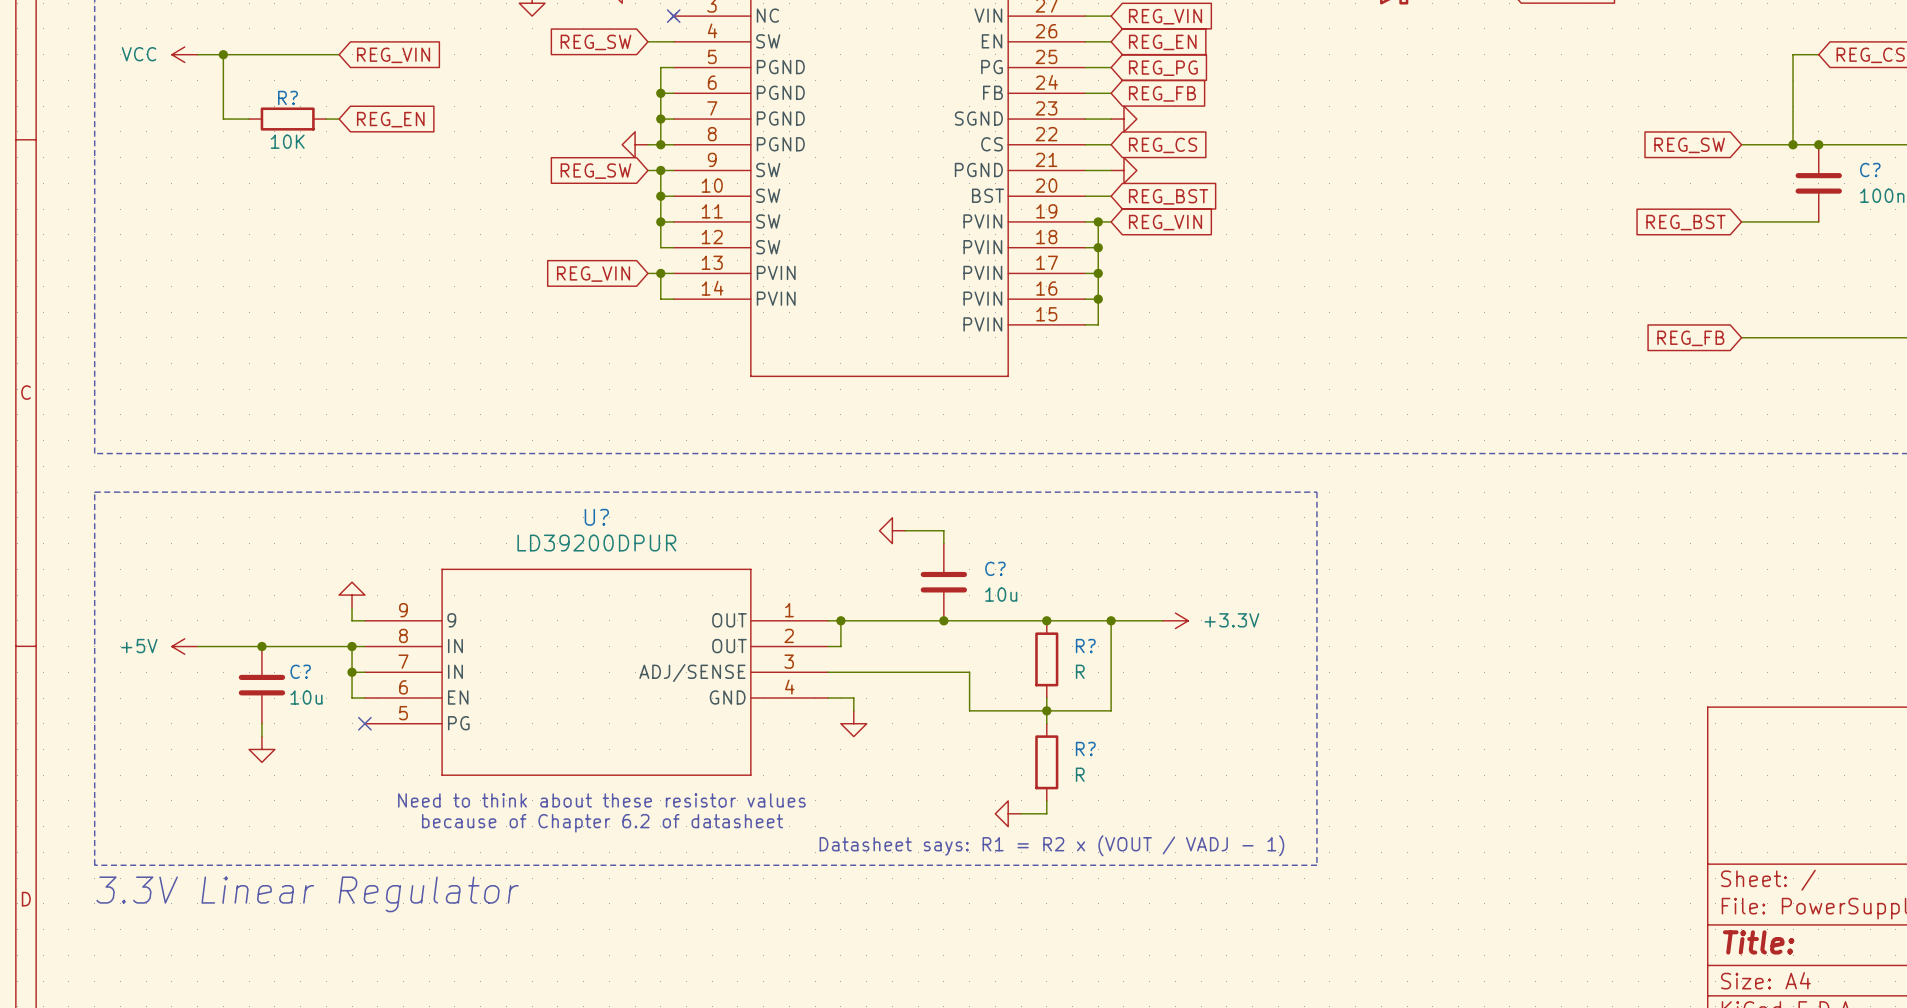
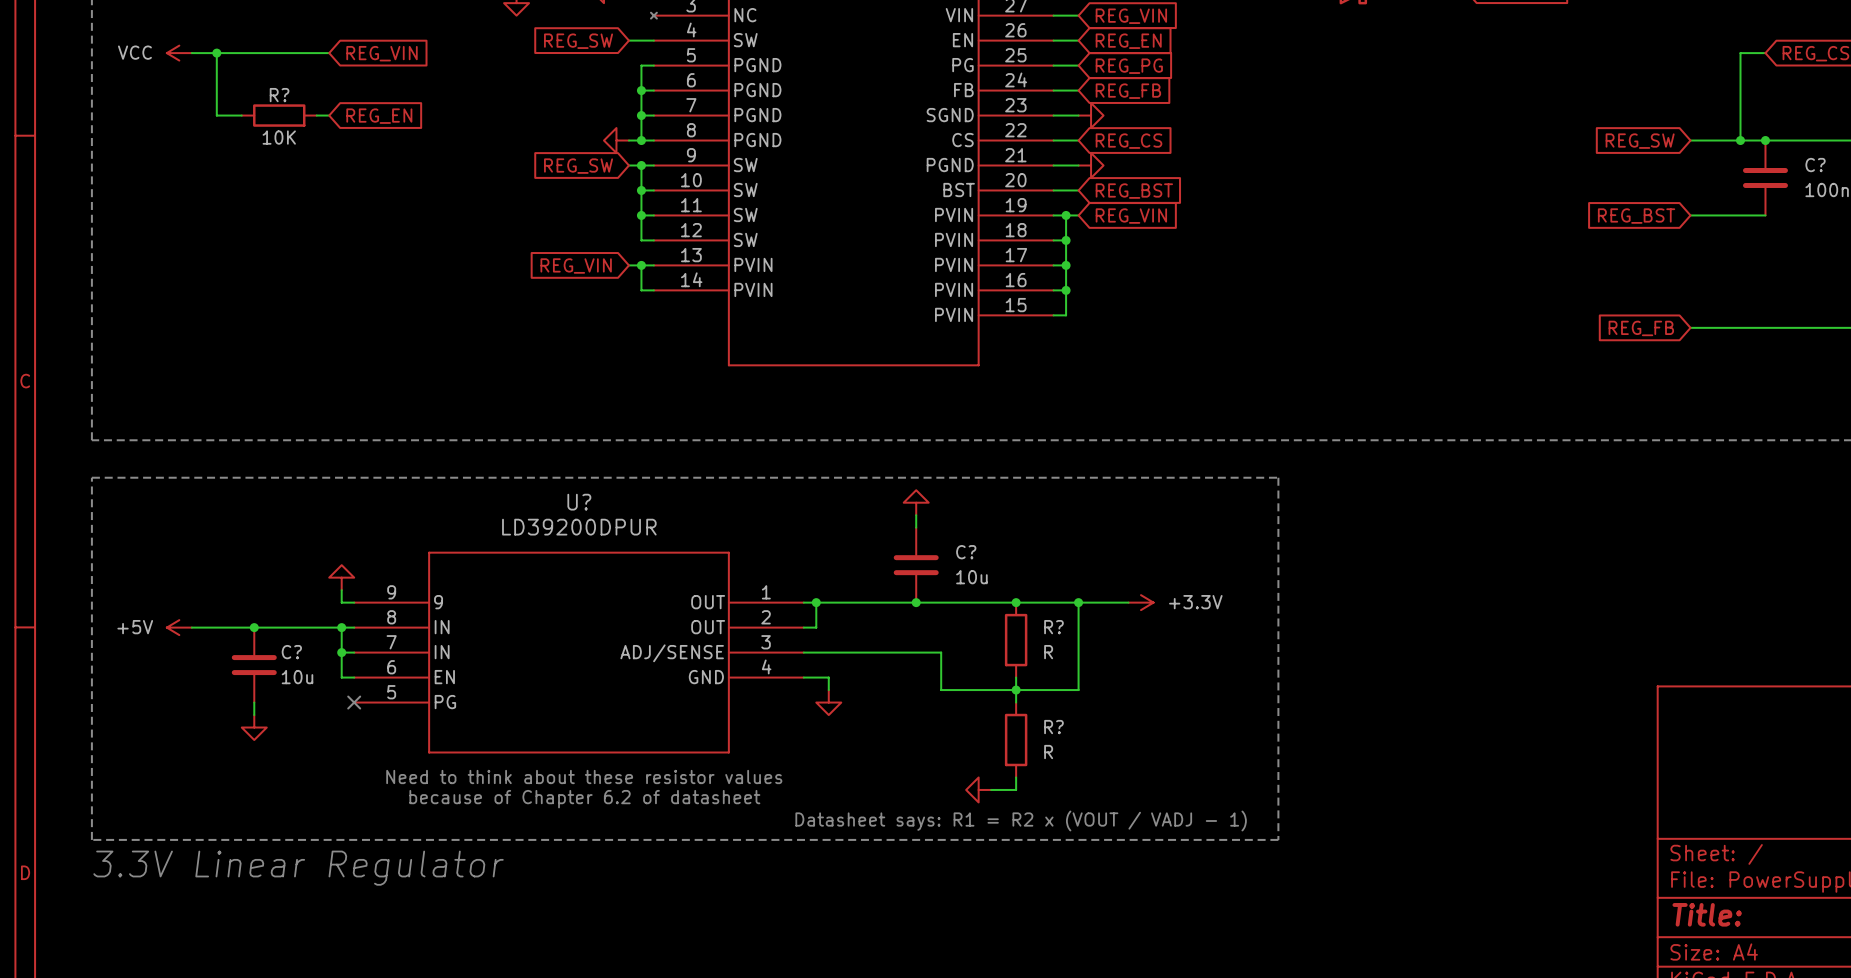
no-connect mark: (673, 16) -> none
power symbol rotation: 0° (892, 530) -> 90° clockwise (916, 502)
power symbol position: (892, 530) -> (916, 502)
wire: (905, 530) (943, 530) -> none

